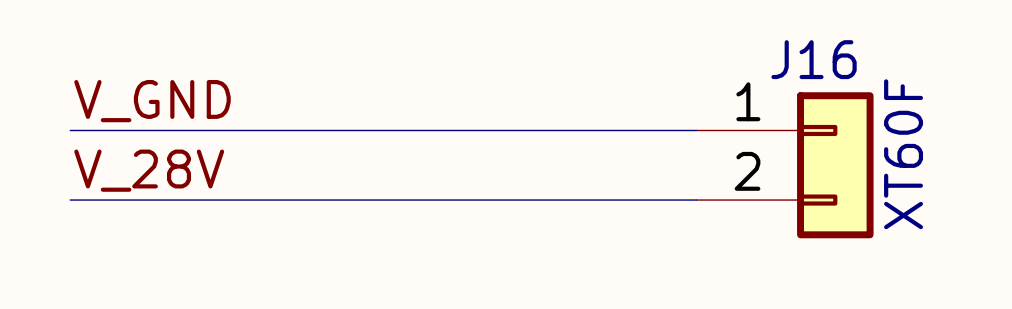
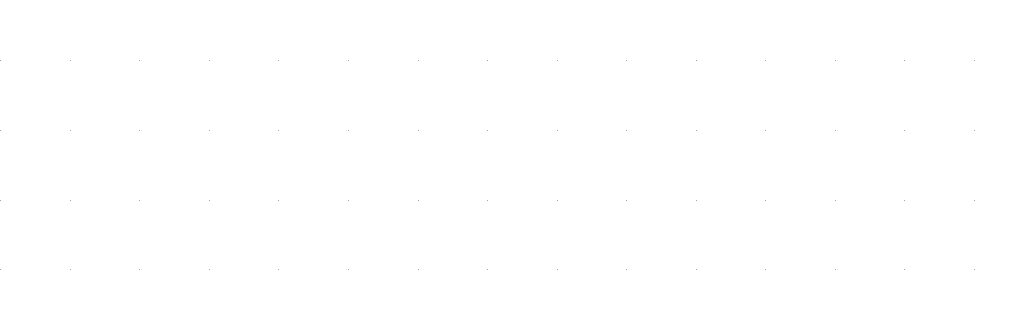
label: V_GND (152, 101) -> none
wire: (70, 130) (696, 130) -> none
J16: XT60F (784, 165) -> none
label: V_28V (149, 170) -> none
wire: (70, 200) (696, 200) -> none

